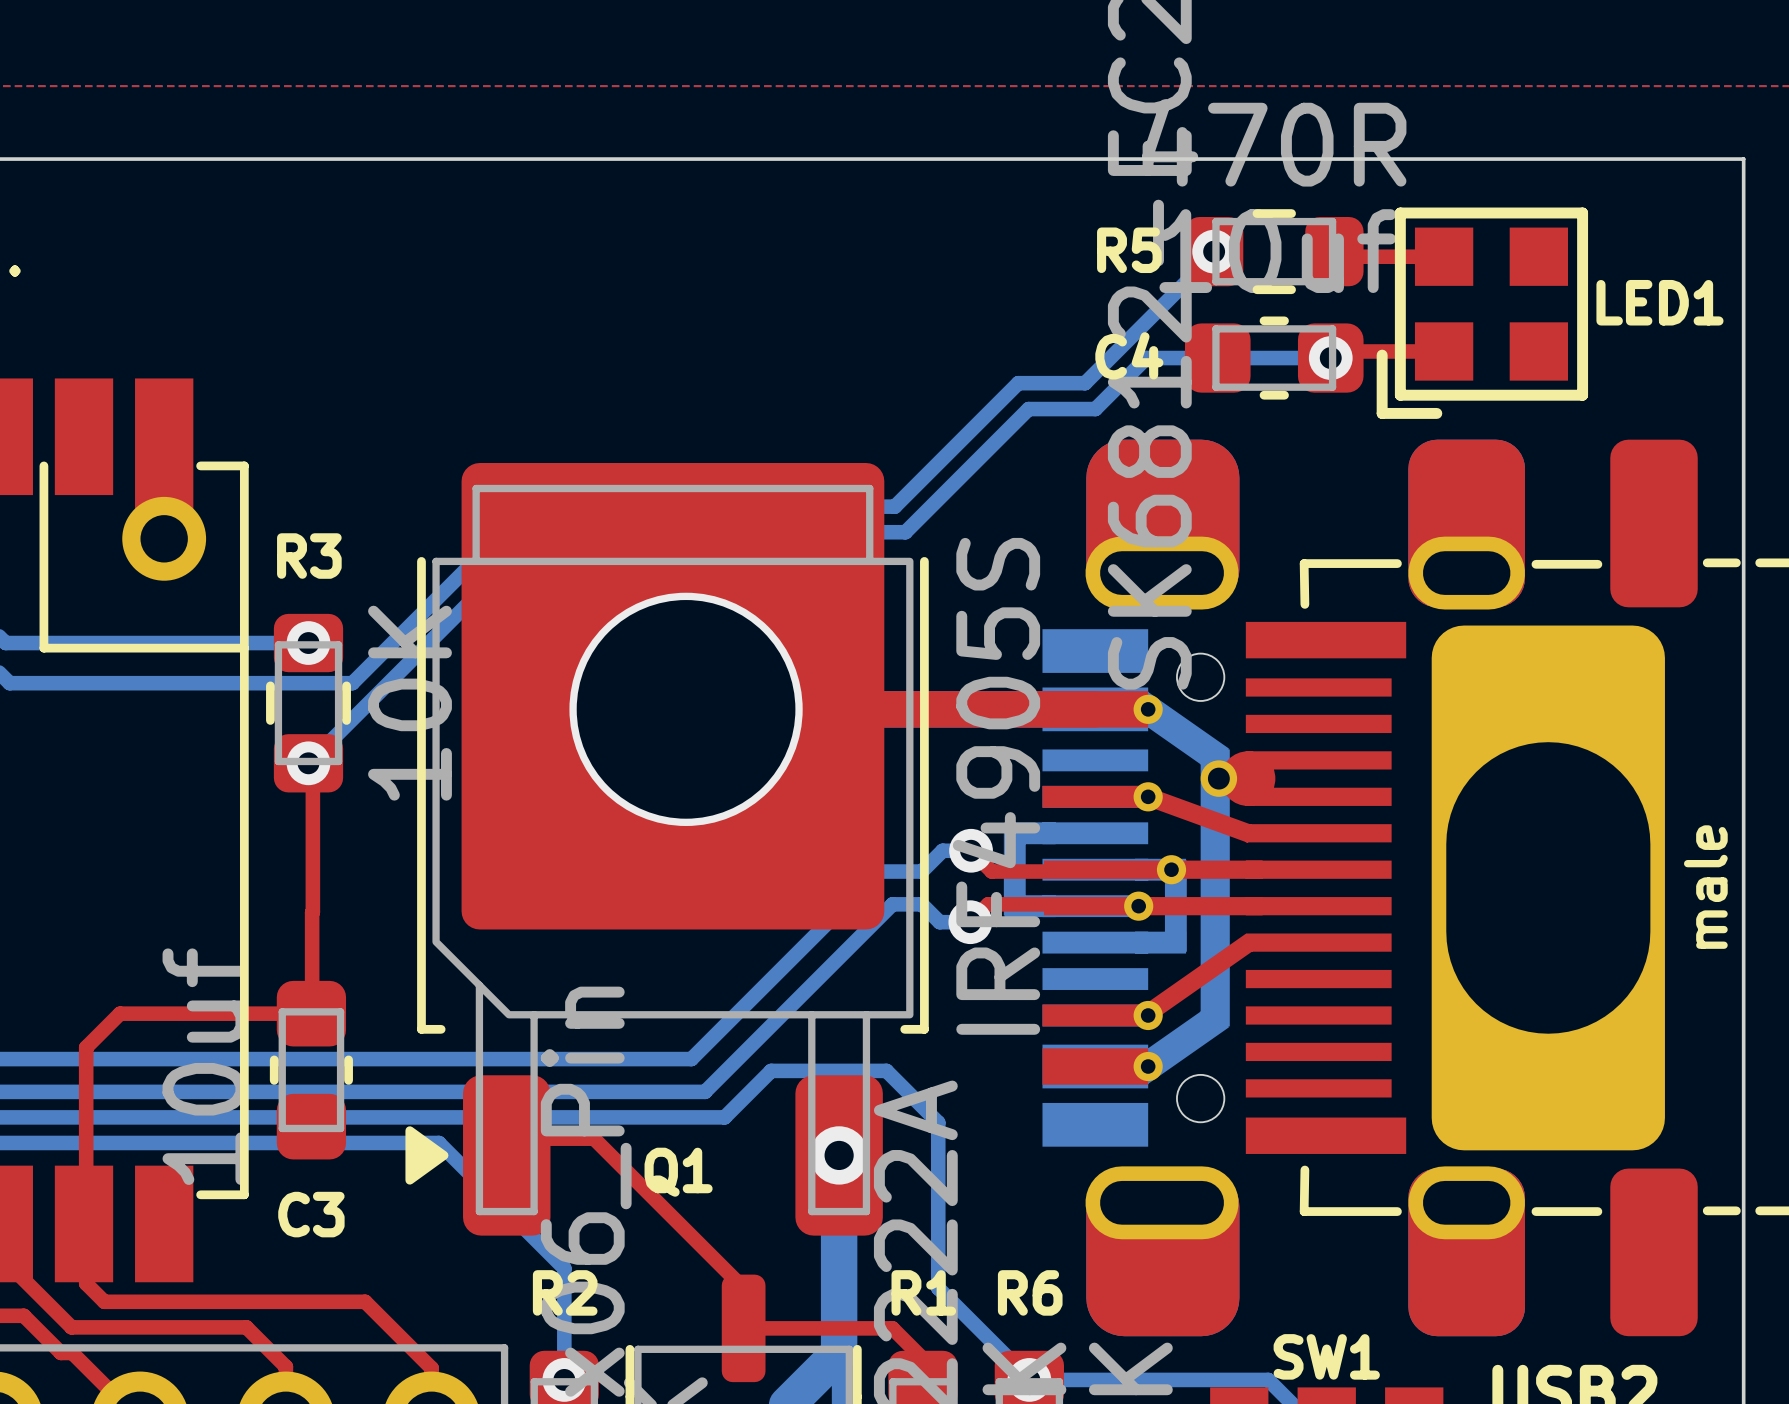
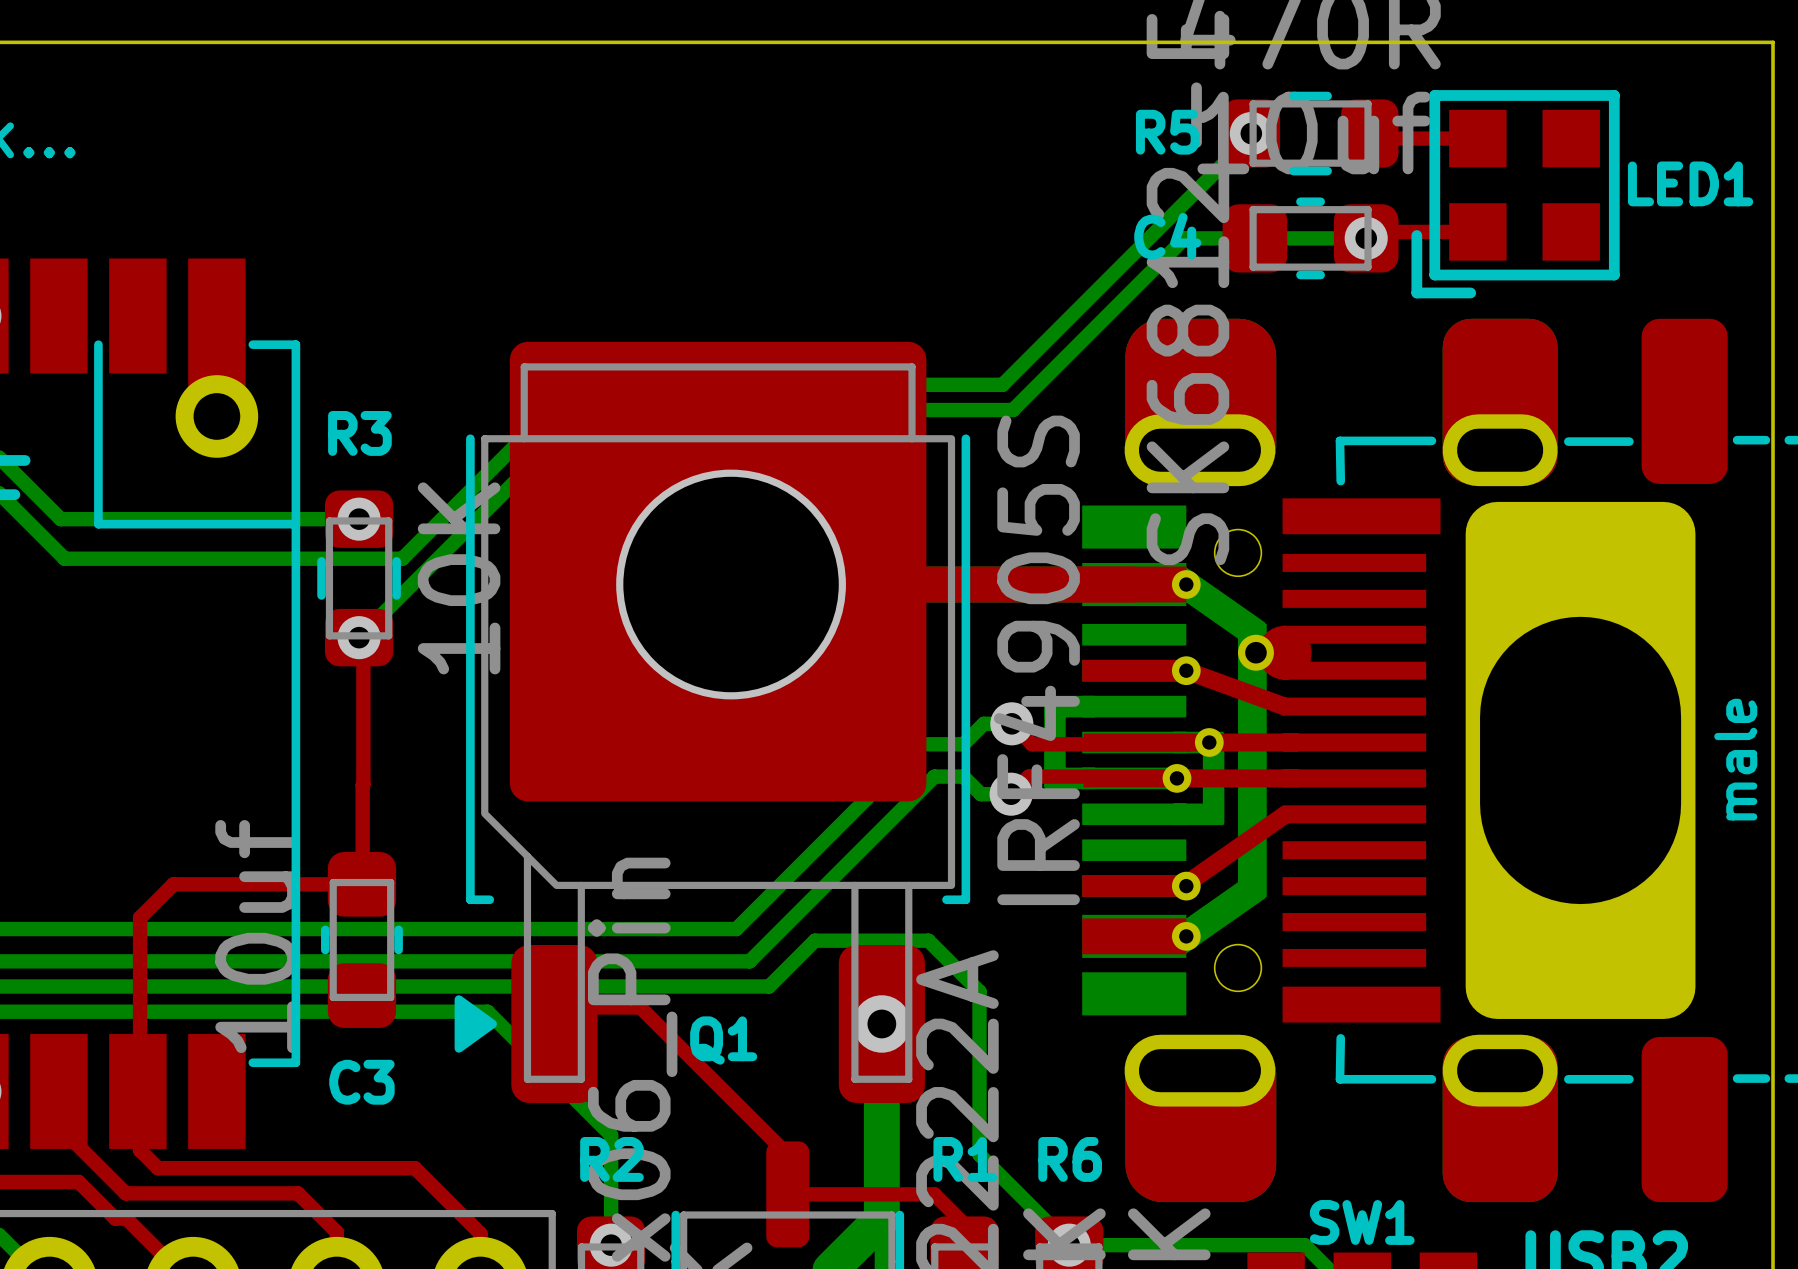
bottom track: (1085, 383) (1018, 383) (894, 506) -> (1124, 263) (1002, 384) (936, 384)
bottom track: (1095, 409) (1028, 409) (905, 532) -> (1134, 288) (1013, 410) (947, 410)

